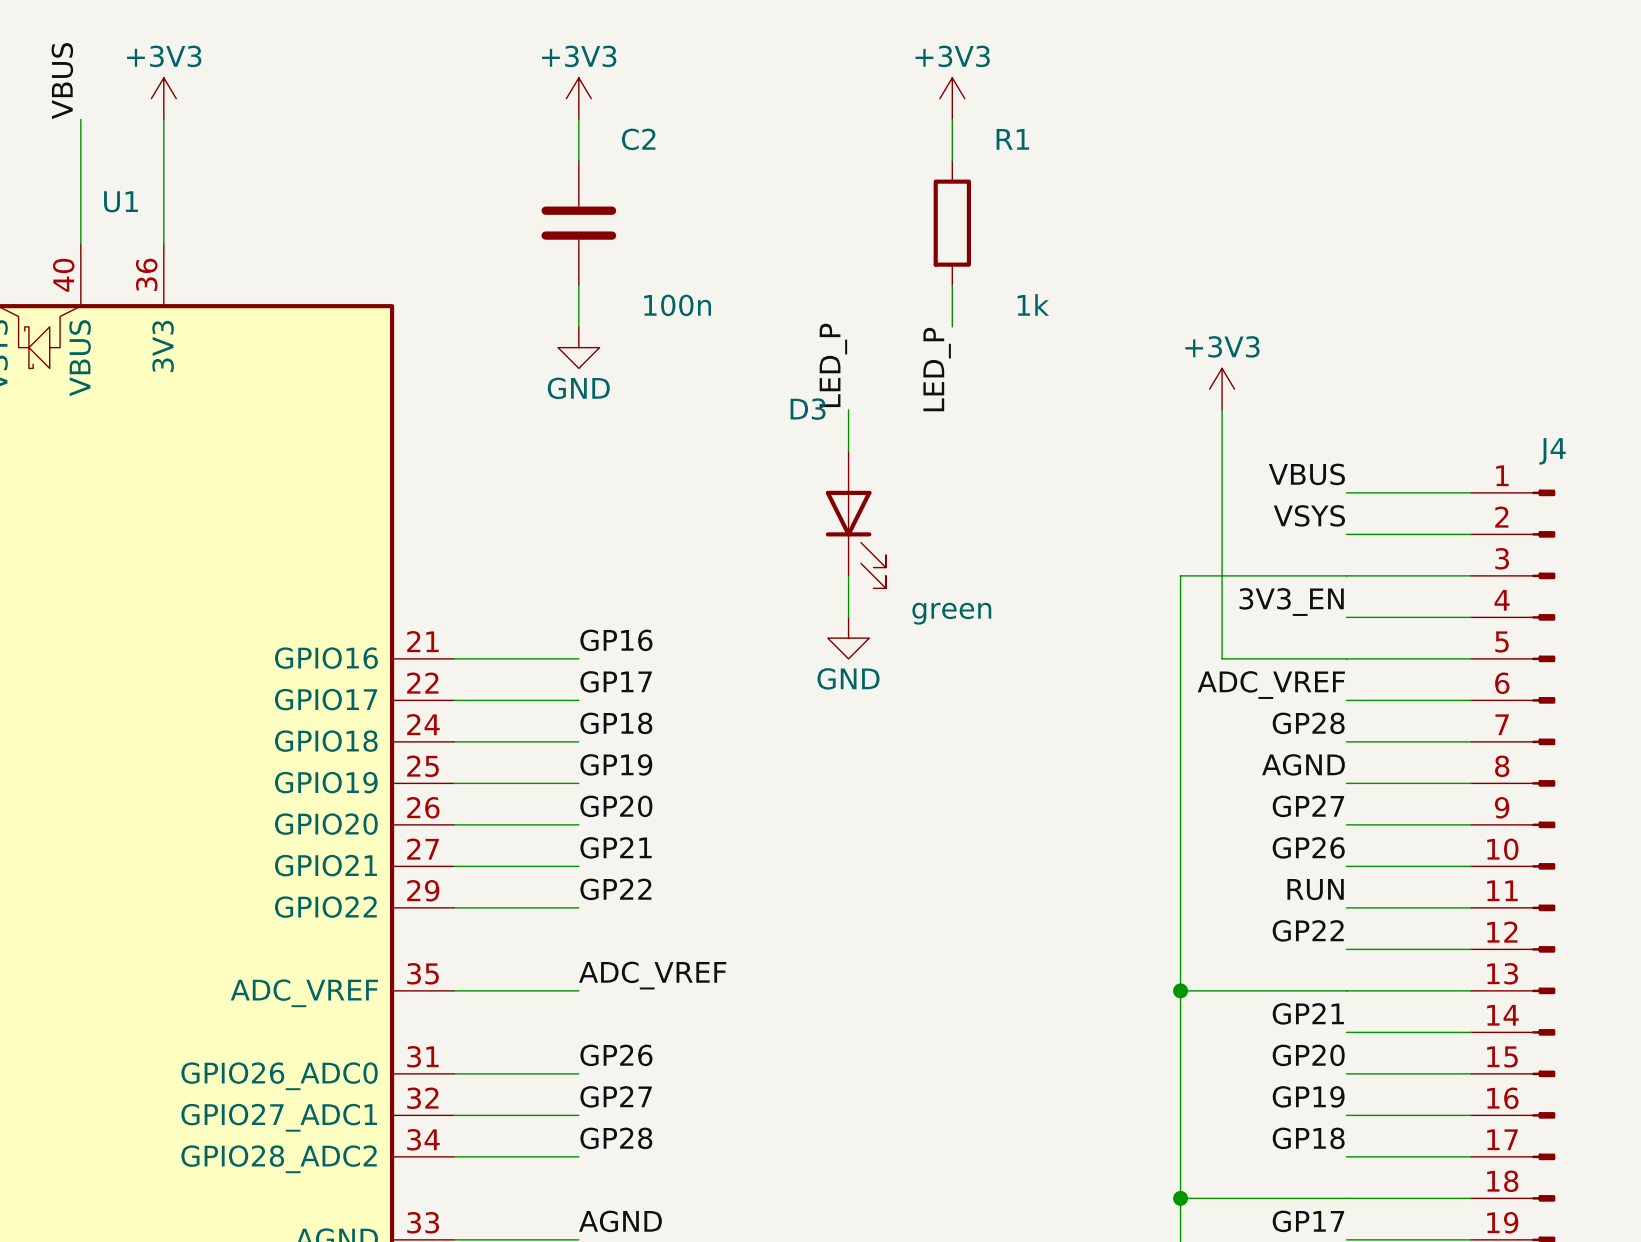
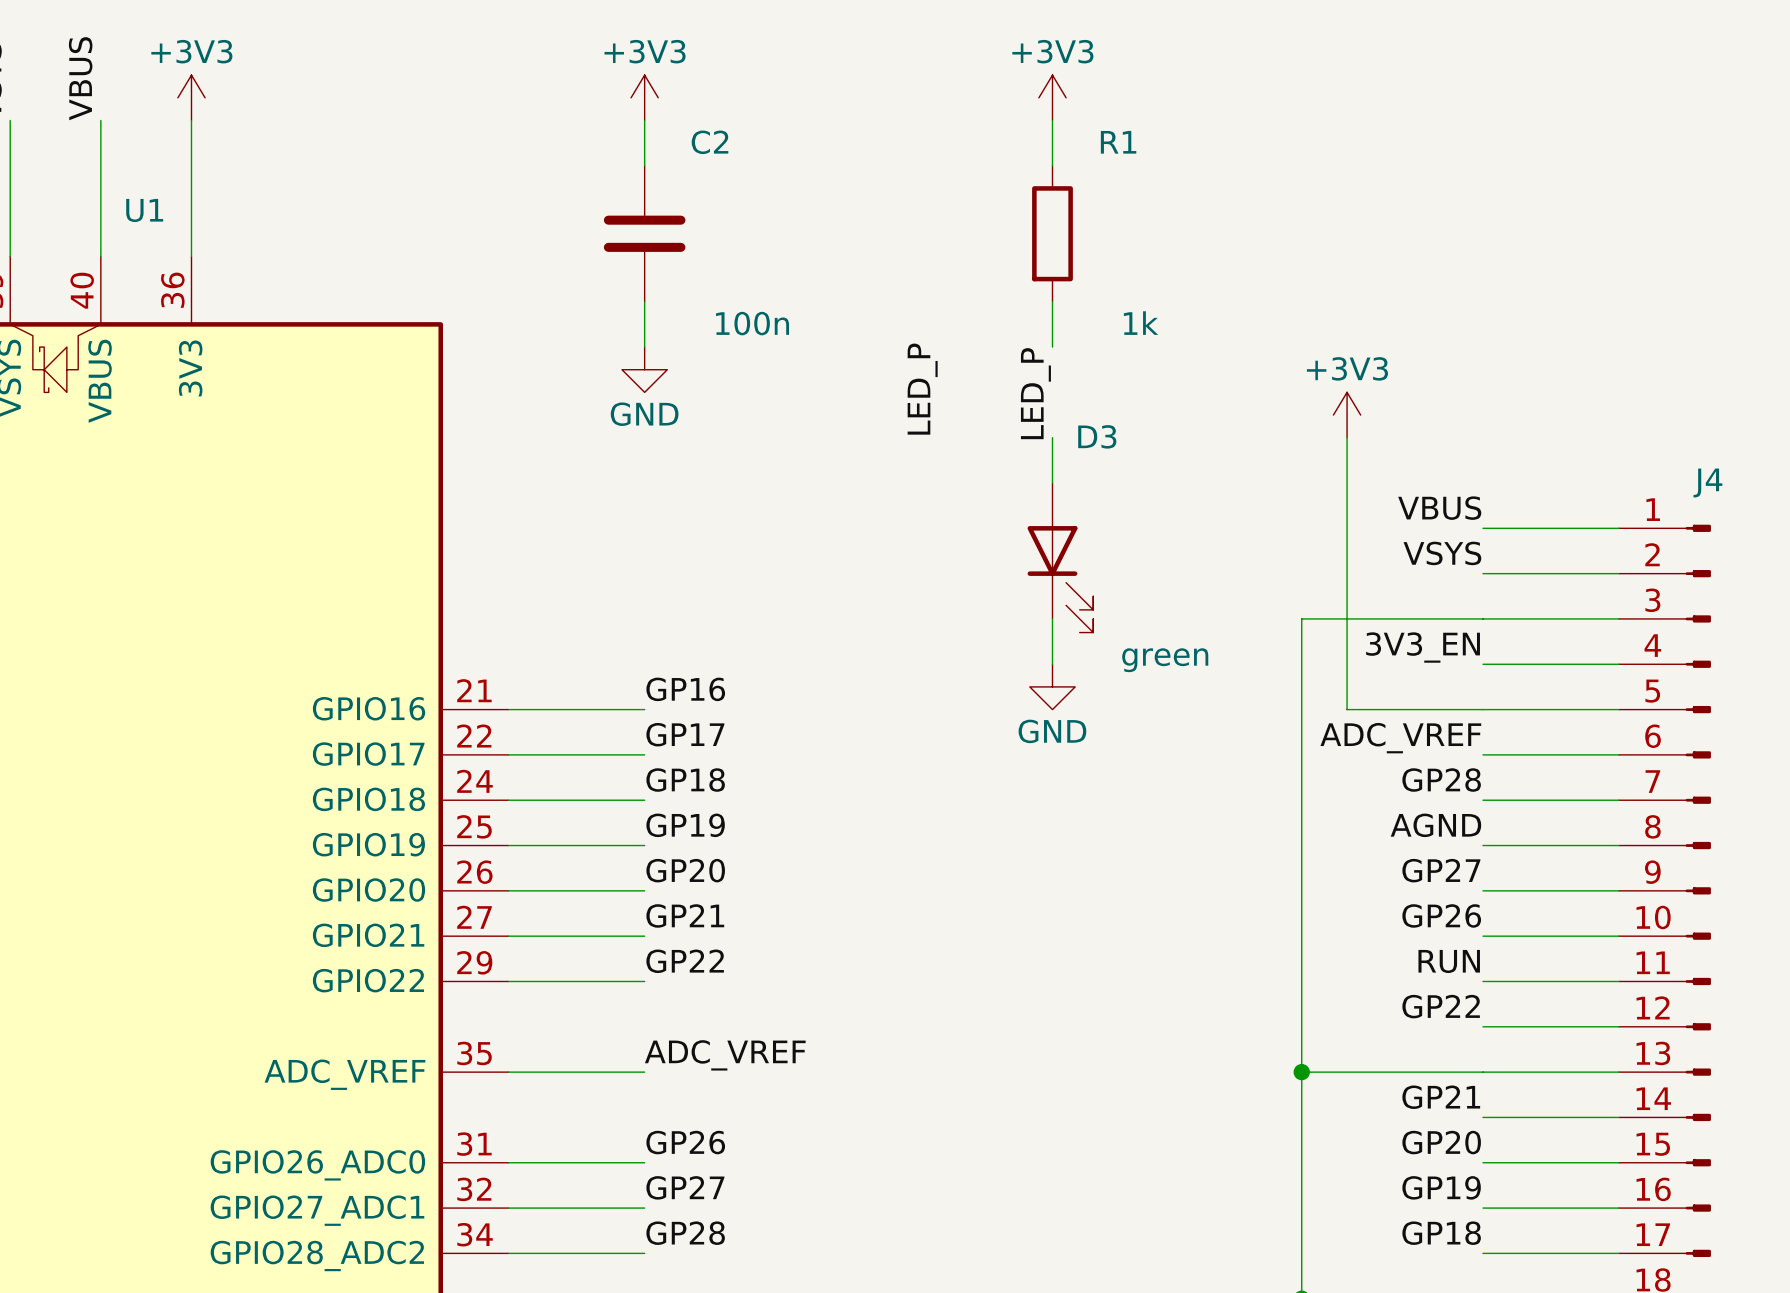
D3 name position: D3 (808, 409) -> D3 (1097, 436)
wire: (848, 409) (848, 451) -> (1052, 437) (1052, 483)
D3 position: (855, 519) -> (1060, 557)
wire: (848, 575) (848, 617) -> (1052, 618) (1052, 664)
power symbol position: GND (848, 638) -> GND (1052, 686)

